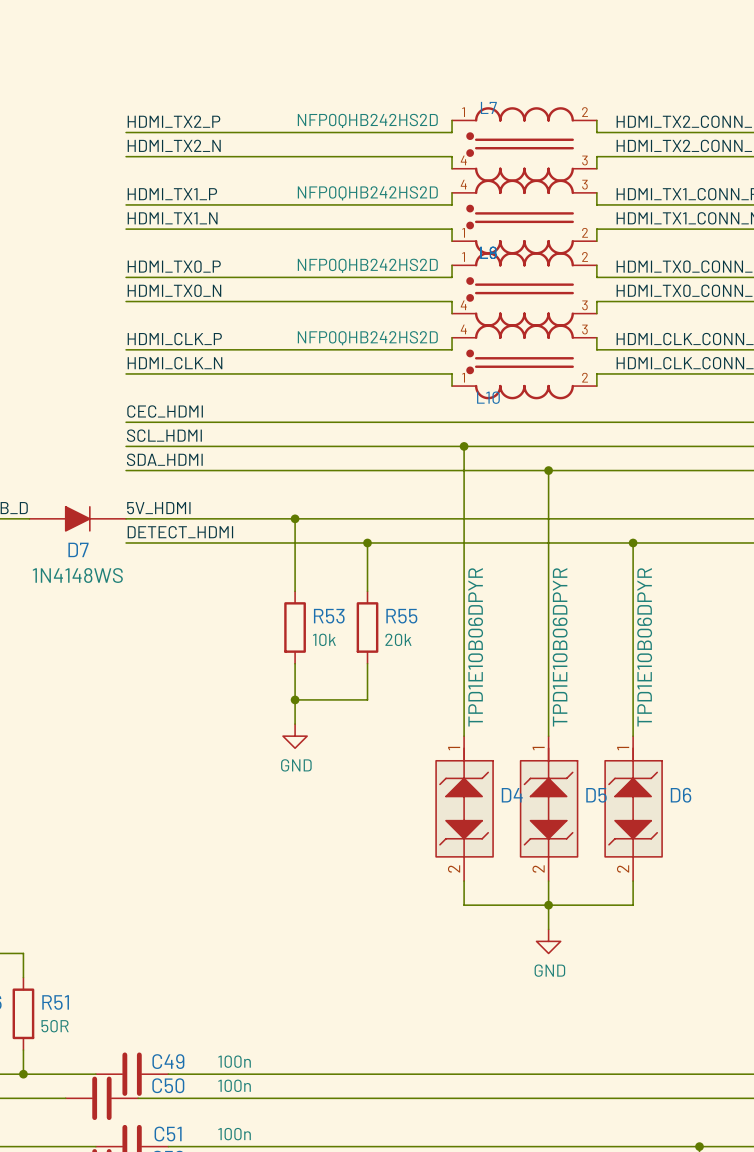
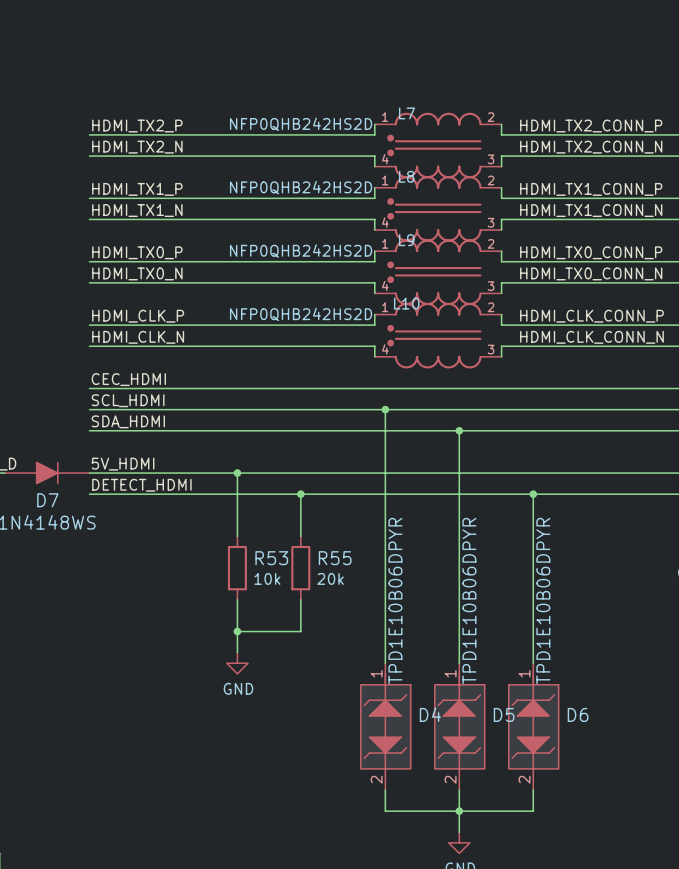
L8 flip: as is (520, 217) -> up-down (434, 208)
L10 flip: as is (520, 361) -> up-down (434, 335)

